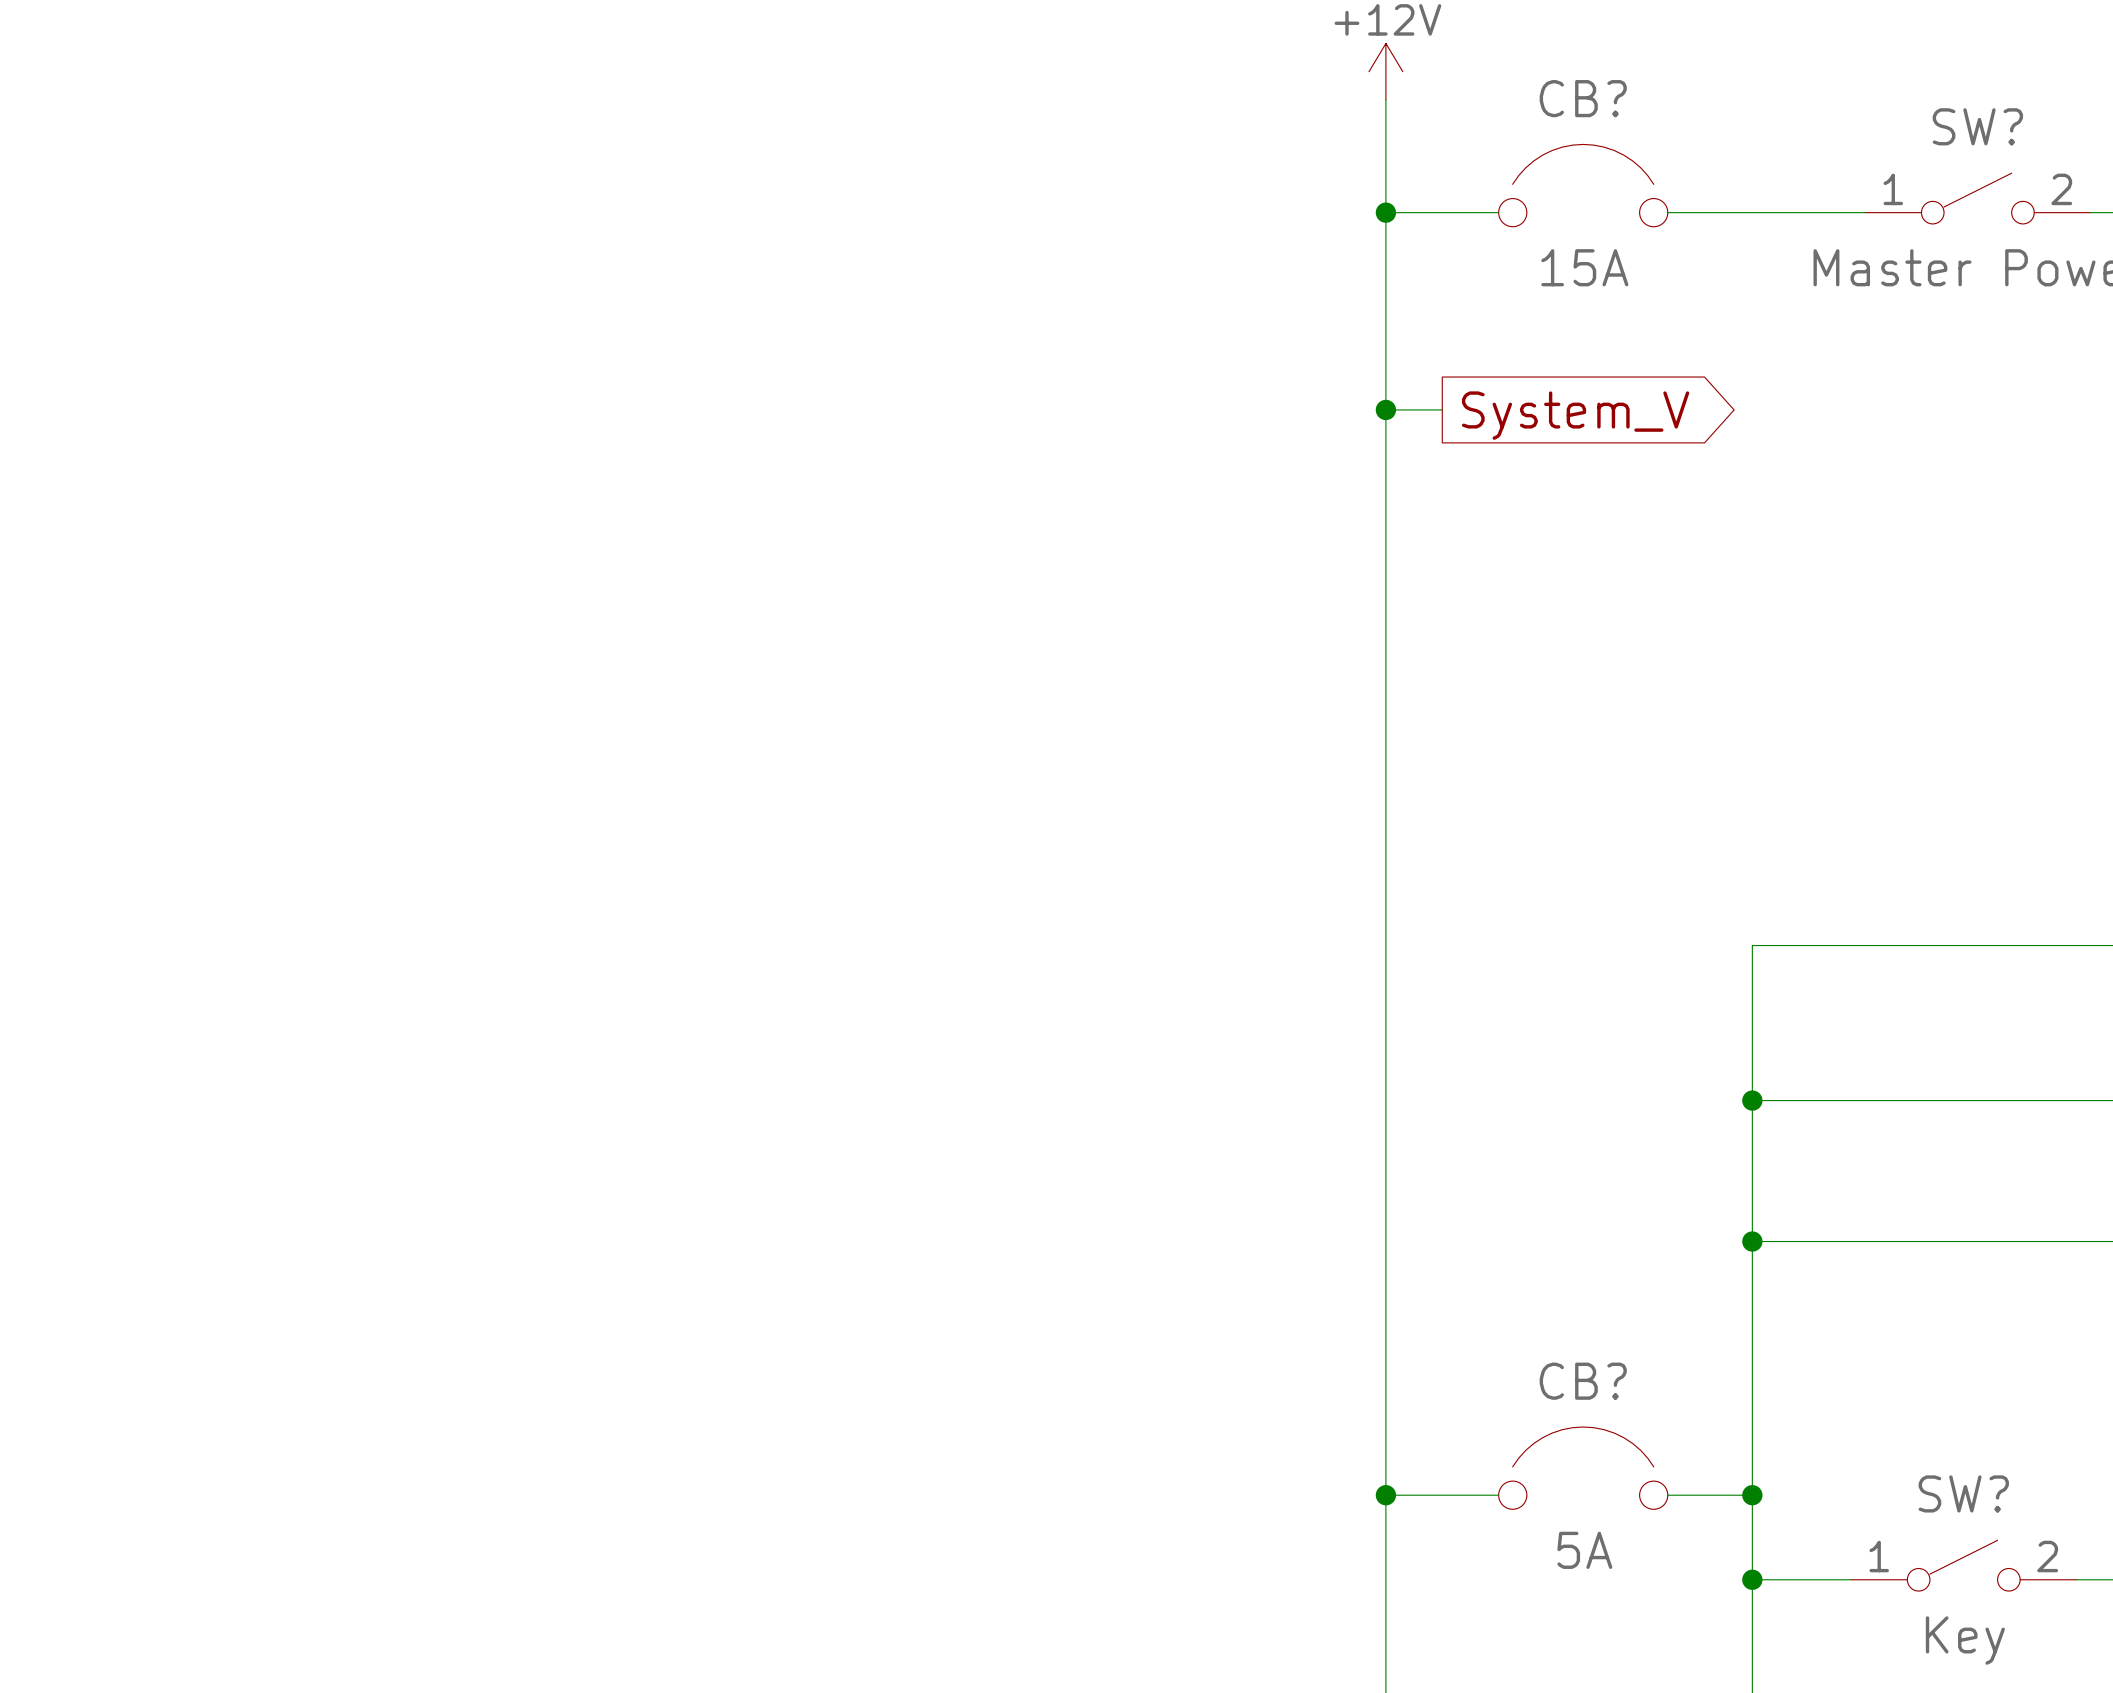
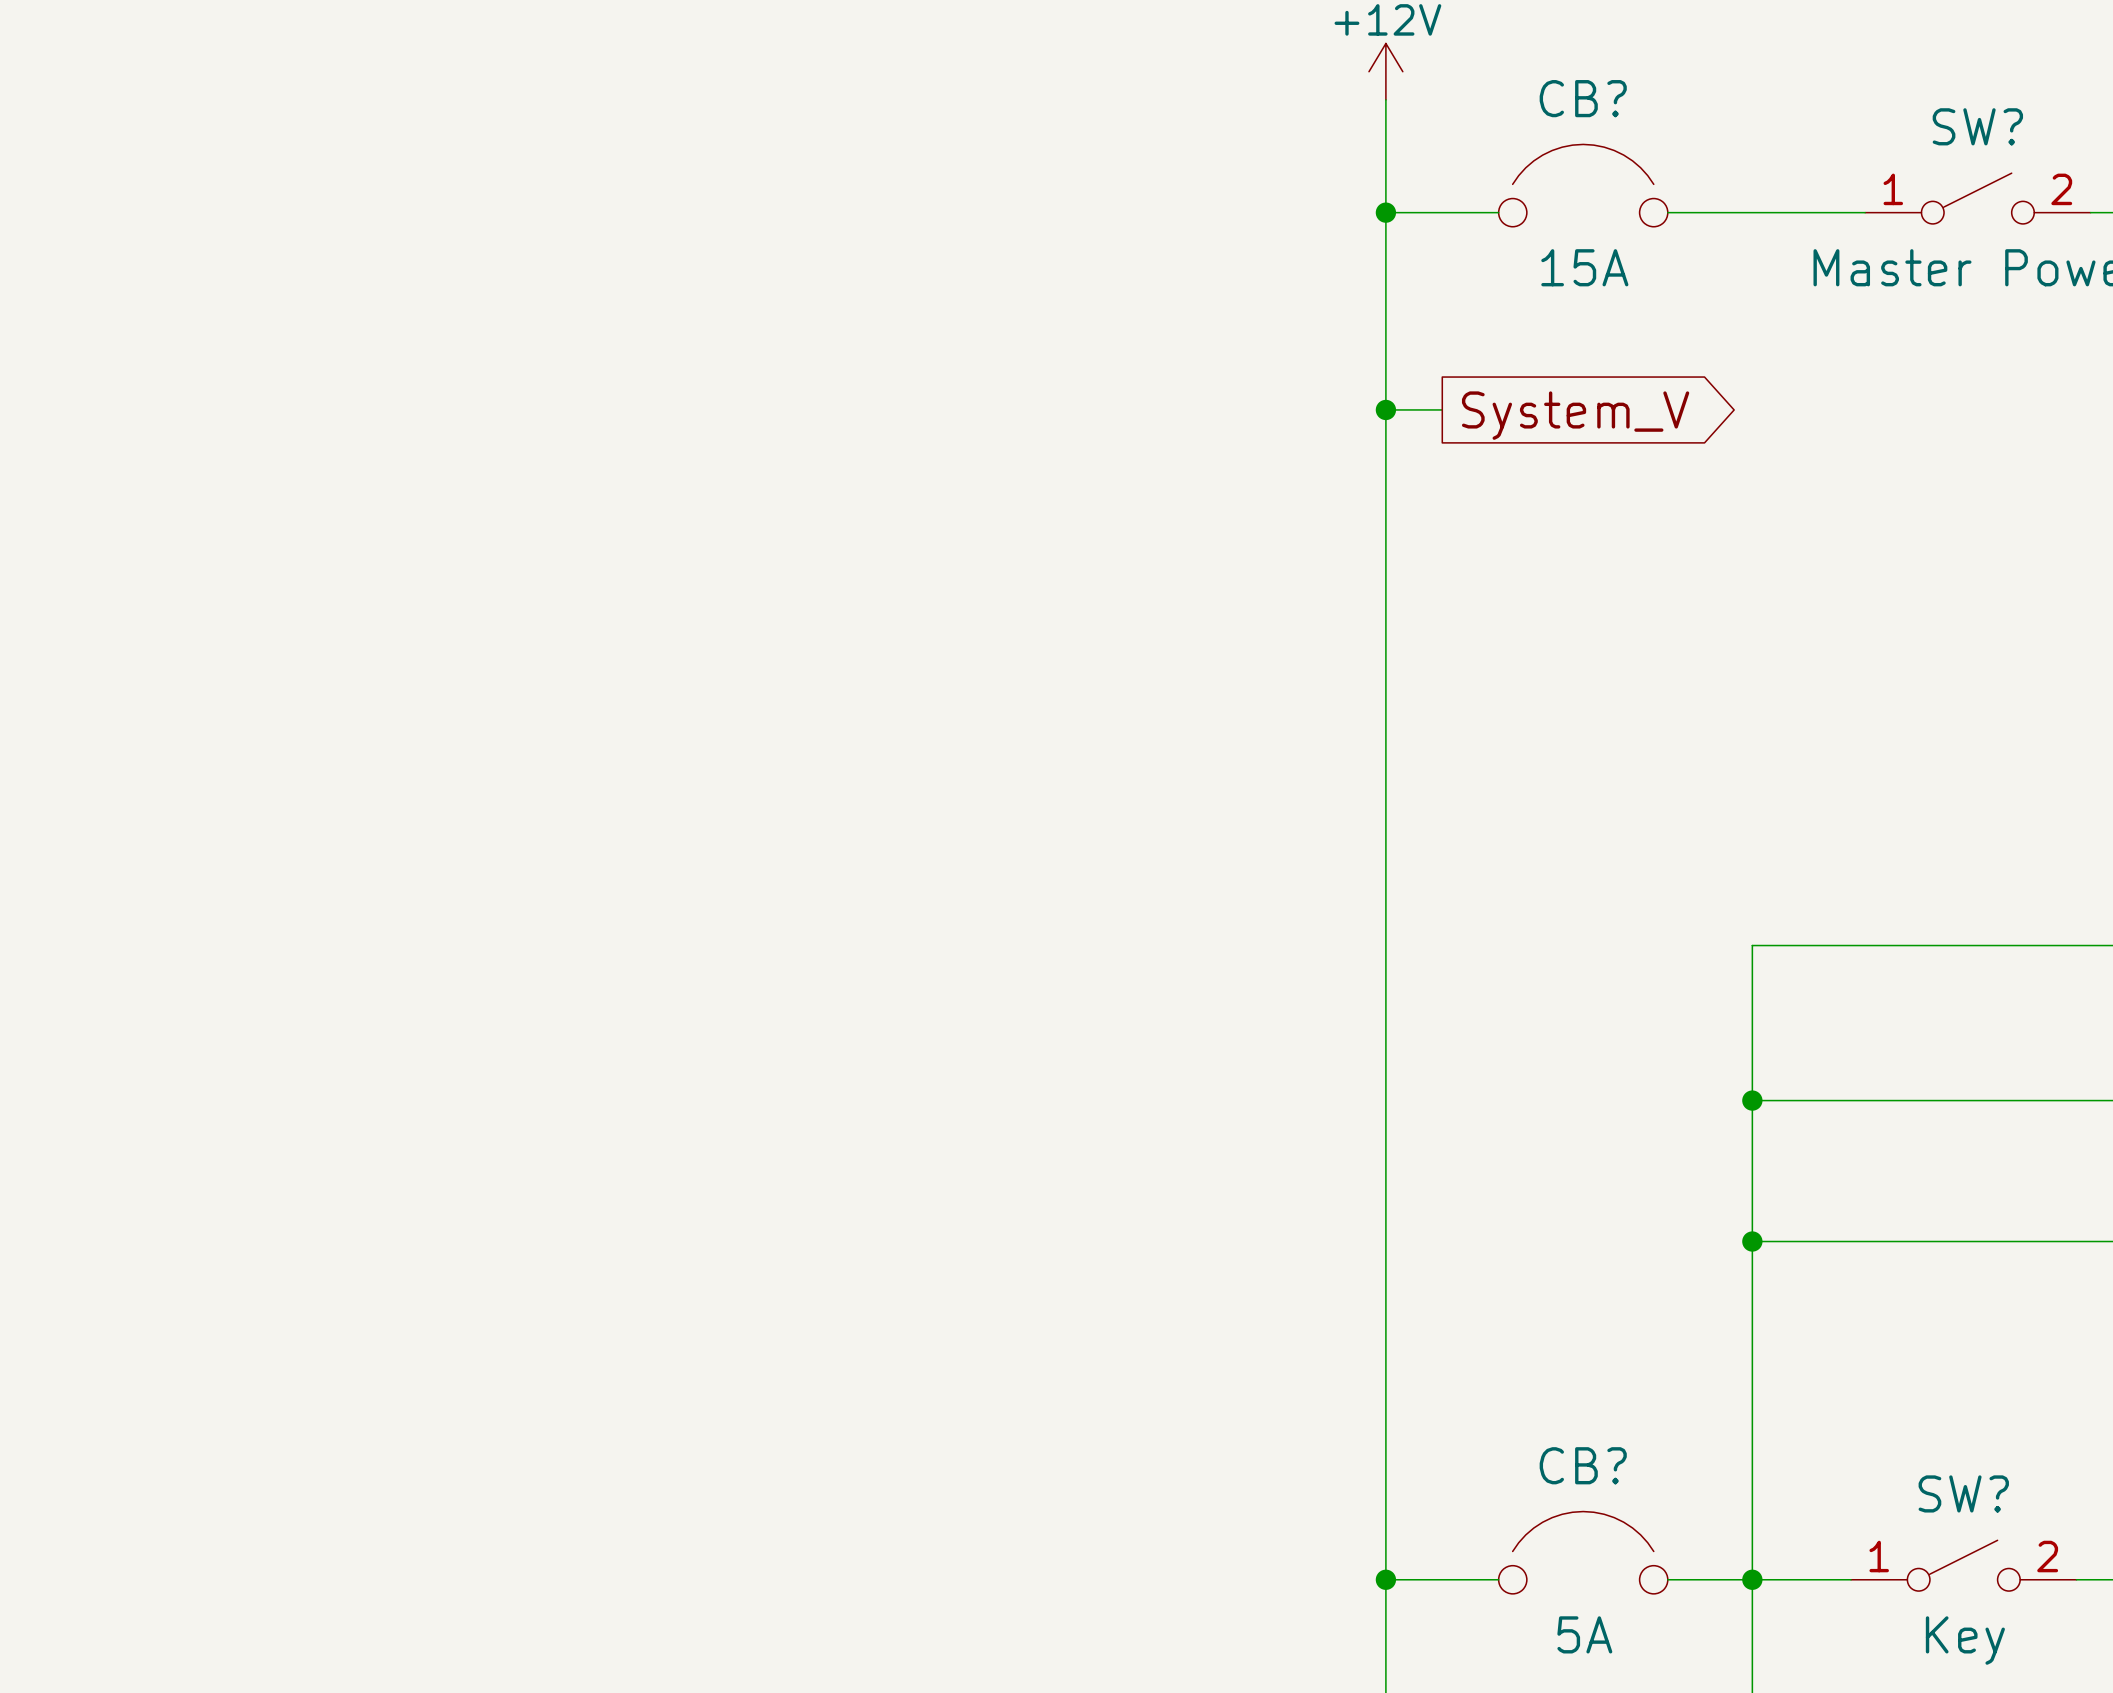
CB? position: (1583, 1468) -> (1583, 1552)
wire: (1385, 1495) (1498, 1495) -> (1385, 1579) (1498, 1579)
junction position: (1385, 1495) -> (1385, 1579)
wire: (1667, 1495) (1752, 1495) -> (1667, 1579) (1752, 1579)
junction: (1752, 1495) -> none

